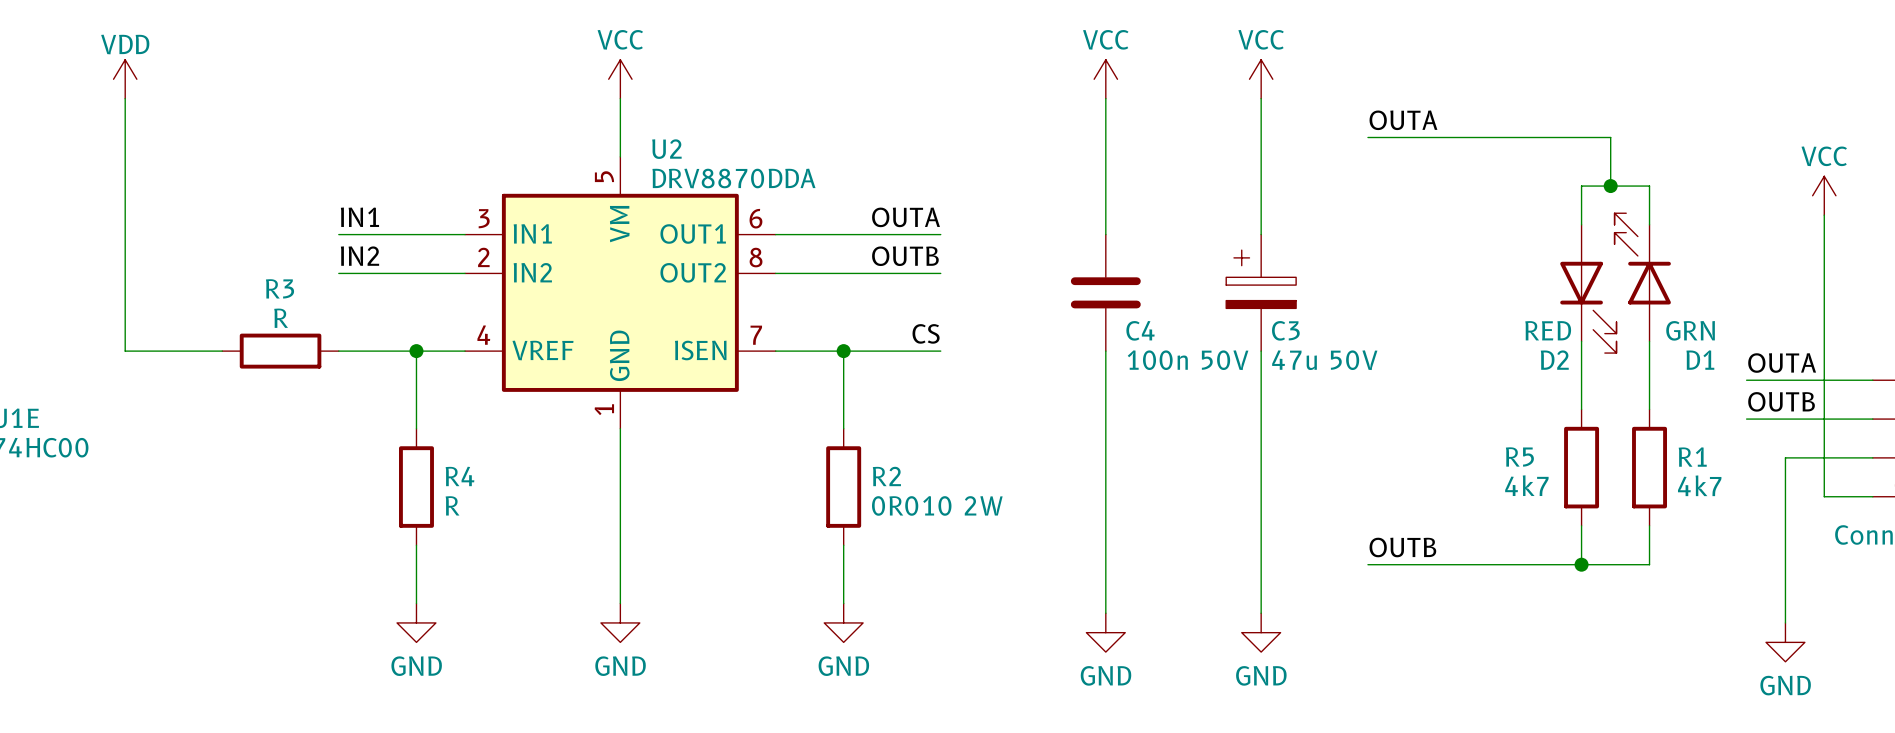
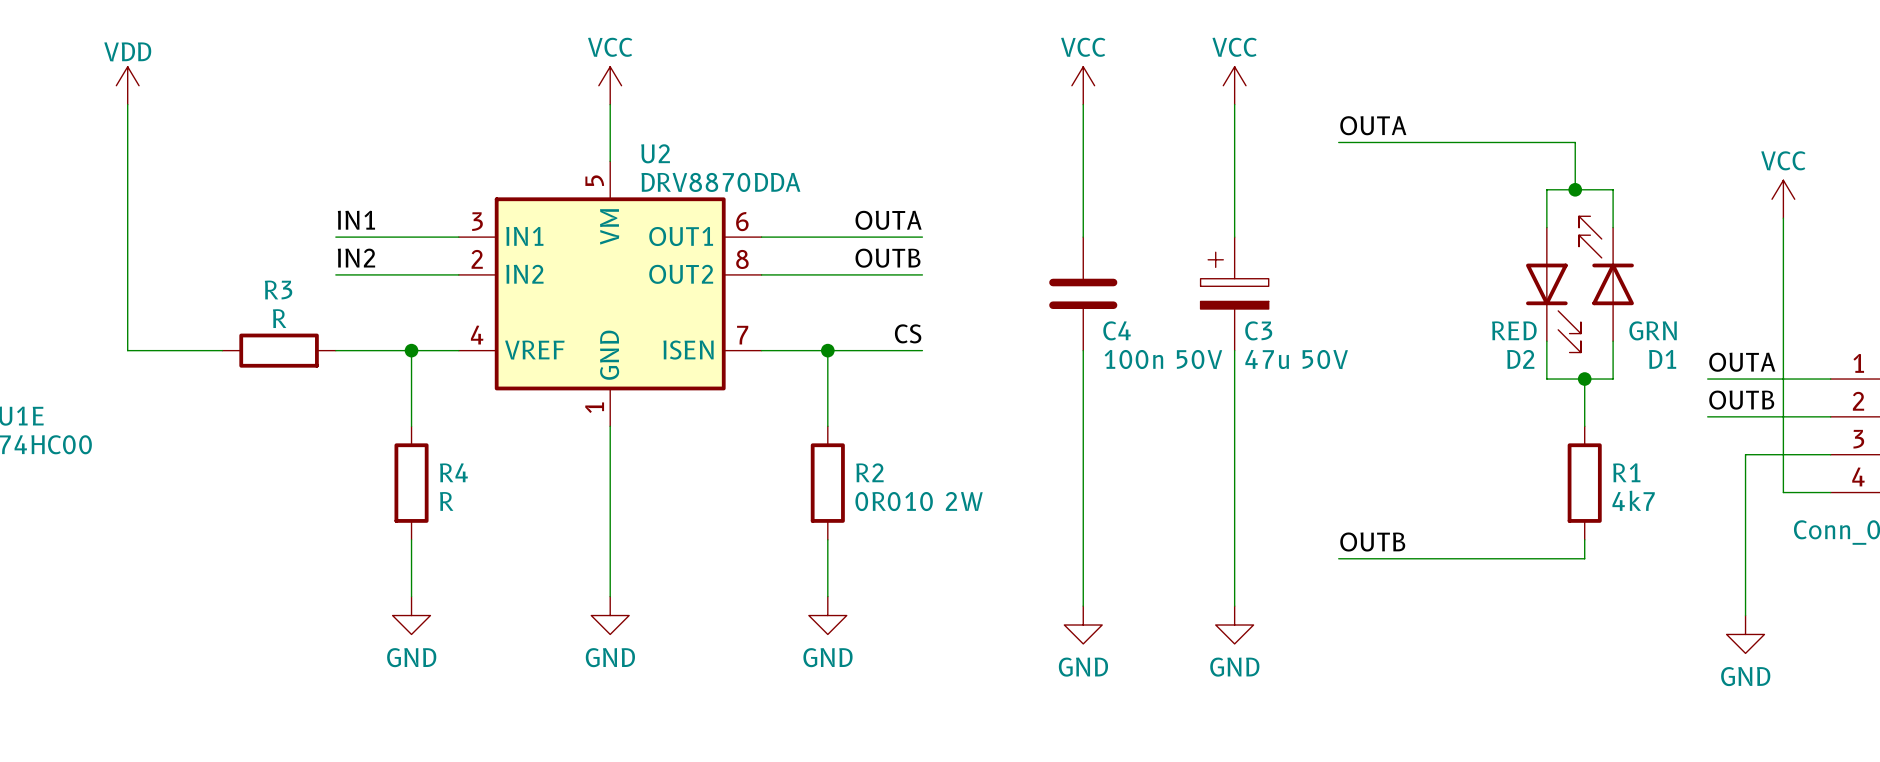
wire: (1581, 380) (1581, 409) -> (1546, 379) (1613, 379)
wire: none -> (1584, 379) (1584, 426)
junction: none -> (1584, 379)
wire: (1649, 380) (1649, 409) -> none
R5: 4k7 (1581, 467) -> none
R1 position: (1649, 467) -> (1584, 483)
wire: (1581, 525) (1581, 564) -> none
wire: (1649, 525) (1649, 564) (1620, 564) -> (1584, 539) (1584, 558)
junction: (1581, 564) -> none

